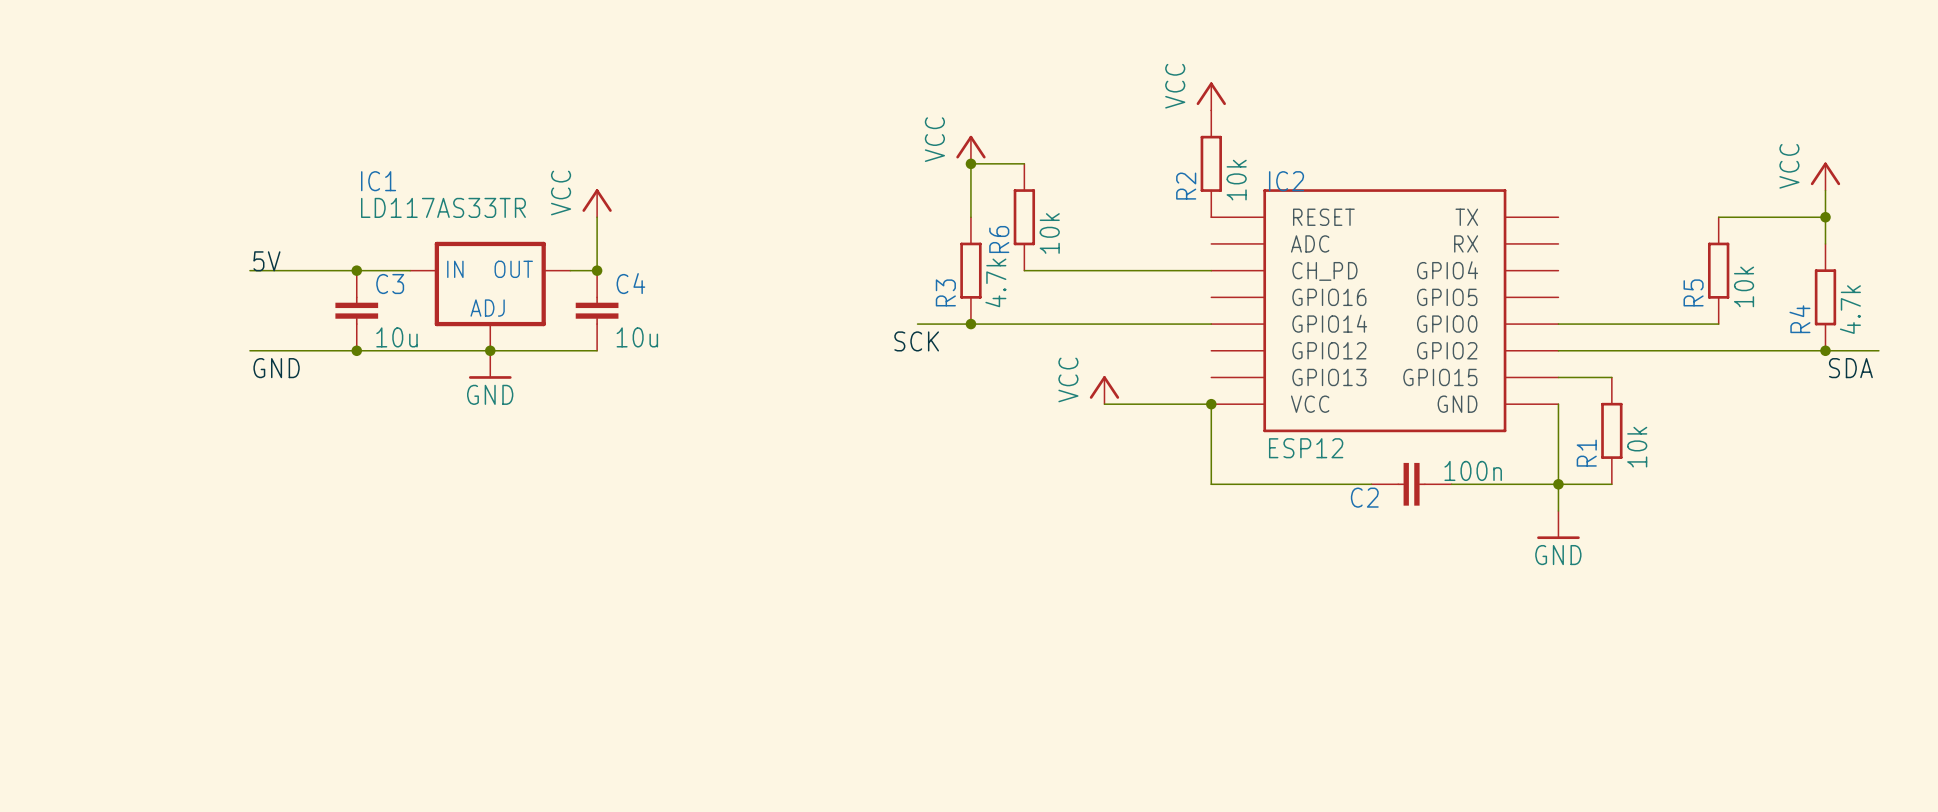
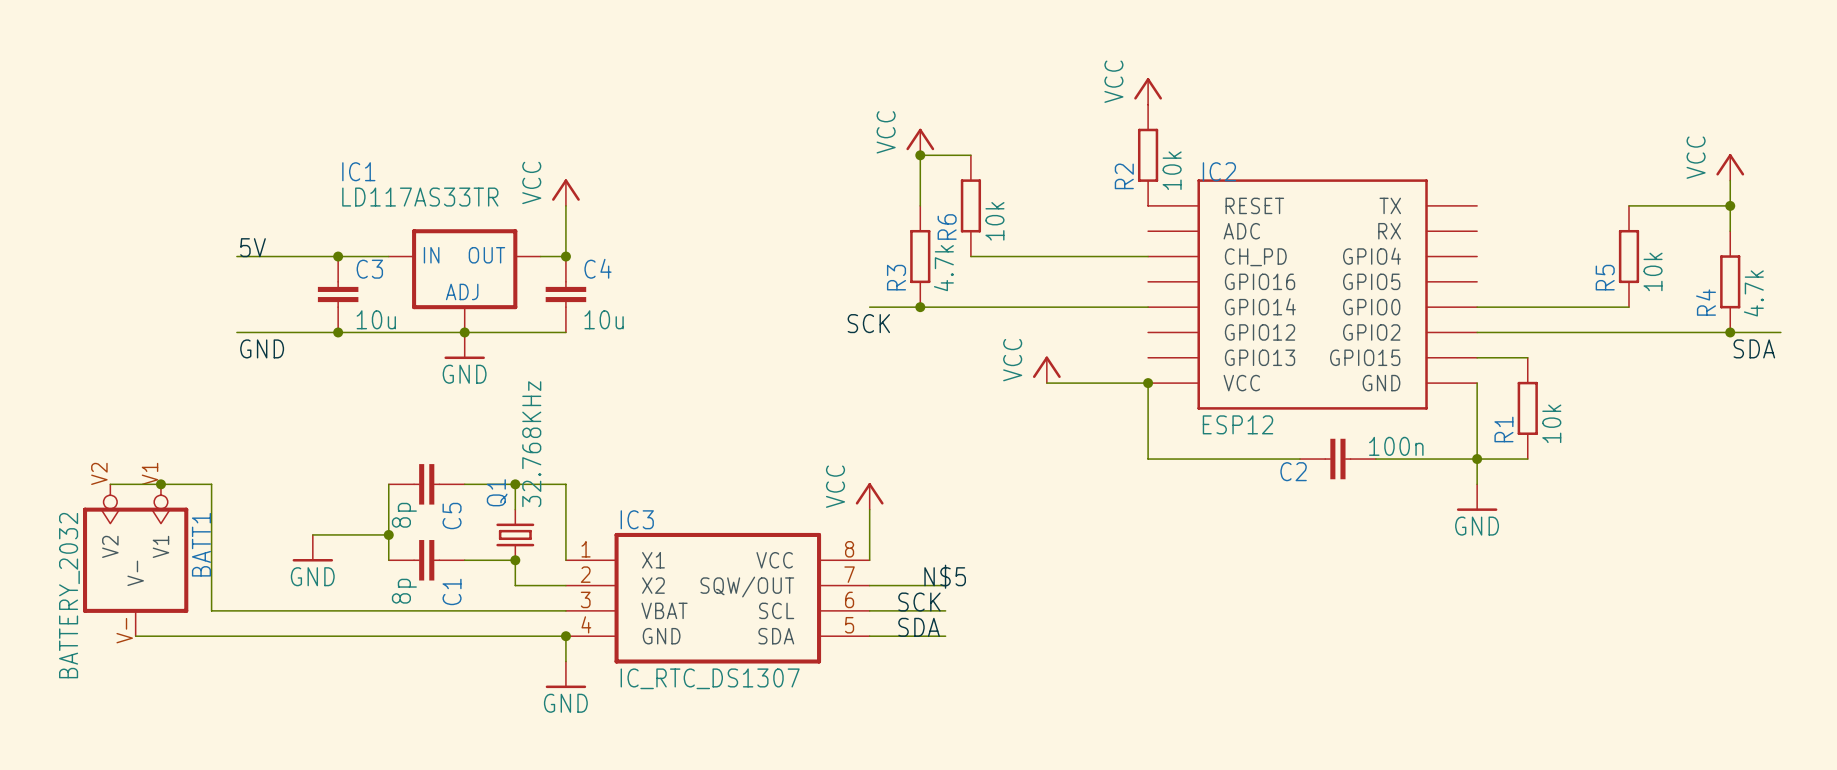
wire: none -> (110, 484) (211, 484) (211, 610) (565, 610)
junction: none -> (160, 484)
wire: none -> (388, 484) (388, 560)
C5: none -> 8p (426, 484)
wire: none -> (464, 484) (565, 484) (565, 560)
wire: none -> (515, 484) (515, 509)
junction: none -> (515, 484)
power symbol: none -> VCC (869, 496)
wire: none -> (869, 509) (869, 560)
wire: none -> (312, 534) (388, 534)
junction: none -> (388, 534)
Q1: none -> 32.768KHz (515, 534)
power symbol: none -> GND (312, 548)
BATT1: none -> BATTERY_2032 (135, 560)
C1: none -> 8p (426, 560)
wire: none -> (464, 560) (515, 560) (515, 585) (565, 585)
junction: none -> (515, 560)
label: none -> N$5 (945, 576)
wire: none -> (869, 585) (945, 585)
IC3: none -> IC_RTC_DS1307 (717, 598)
label: none -> SCK (919, 602)
wire: none -> (869, 610) (945, 610)
label: none -> SDA (919, 627)
wire: none -> (135, 636) (565, 636) (565, 661)
junction: none -> (565, 636)
wire: none -> (869, 636) (945, 636)
power symbol: none -> GND (565, 674)

